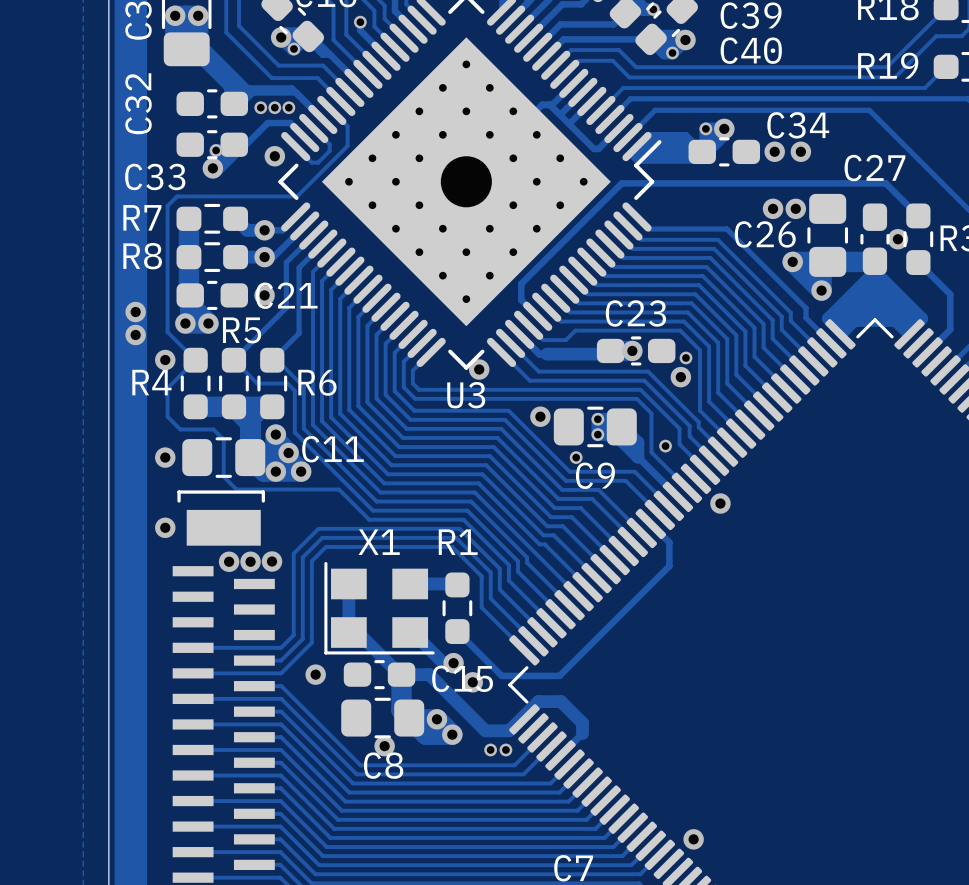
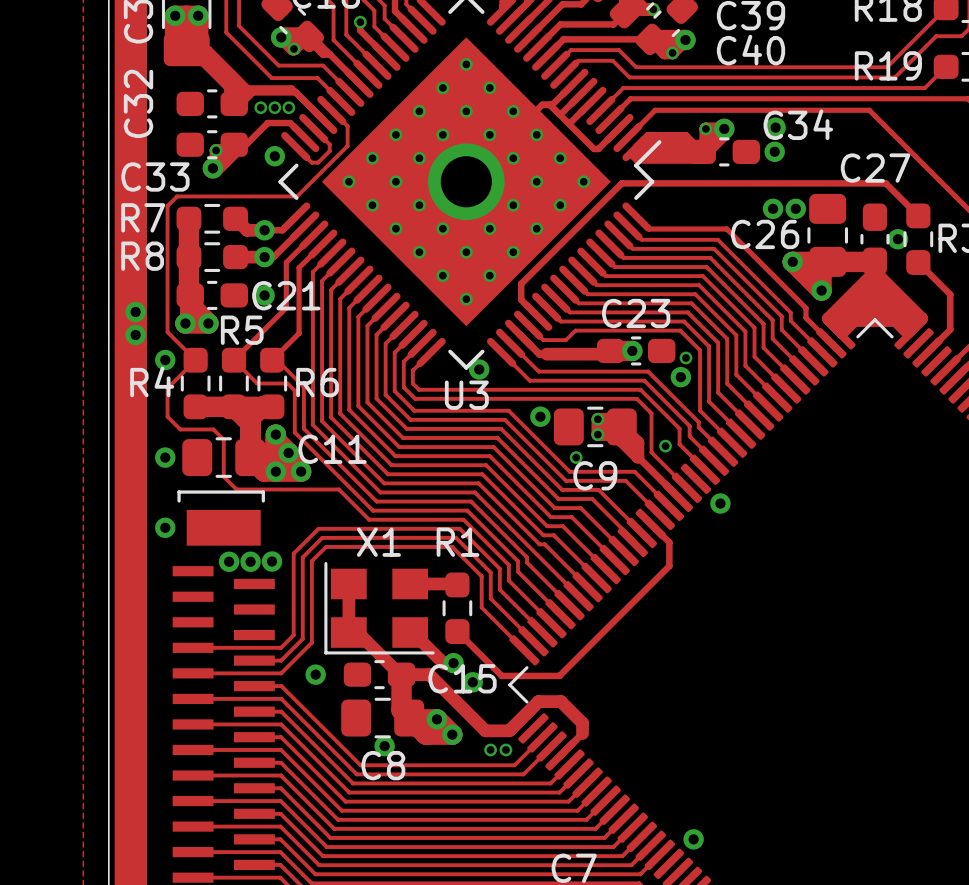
via position: (800, 151) -> (775, 127)

